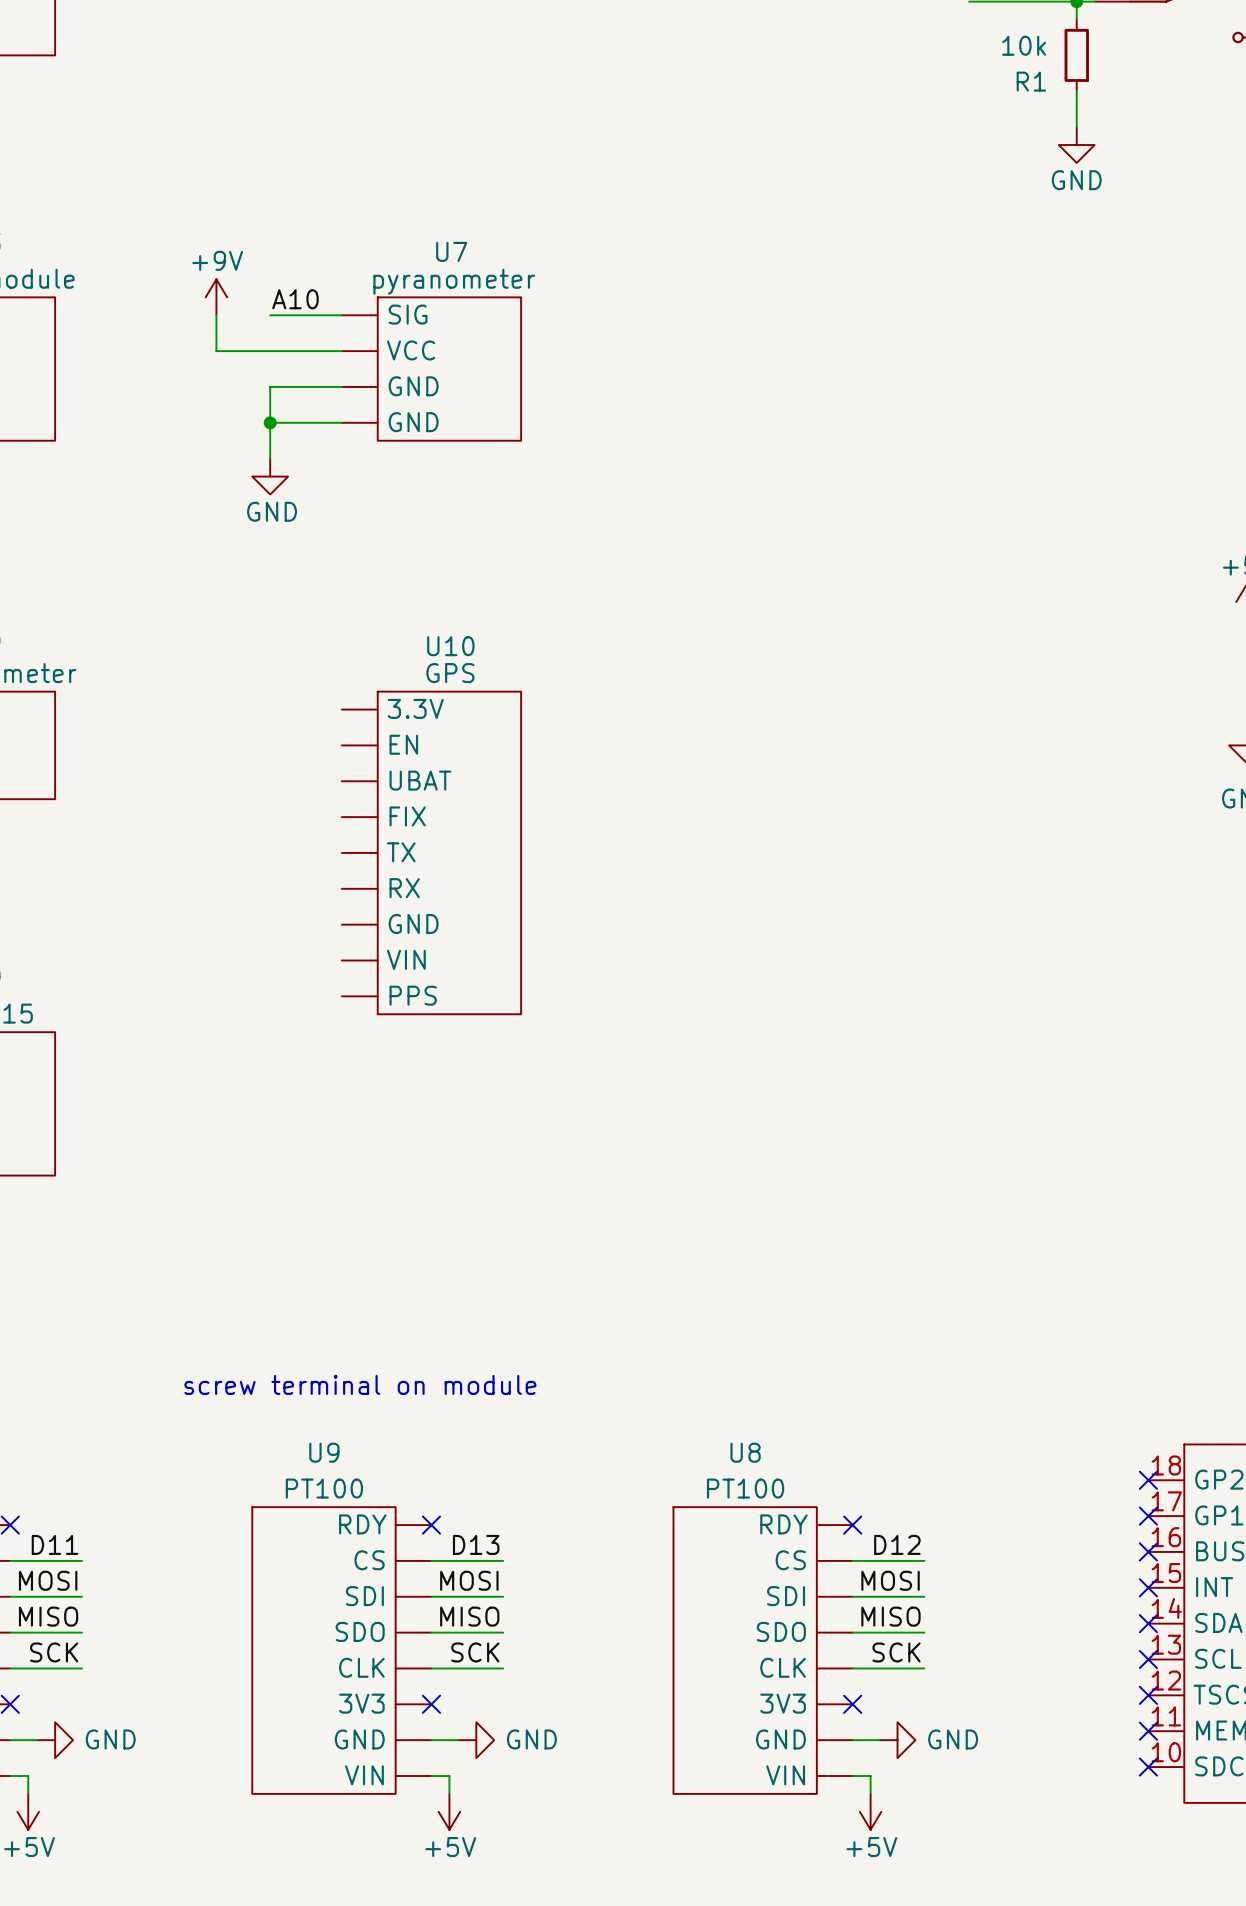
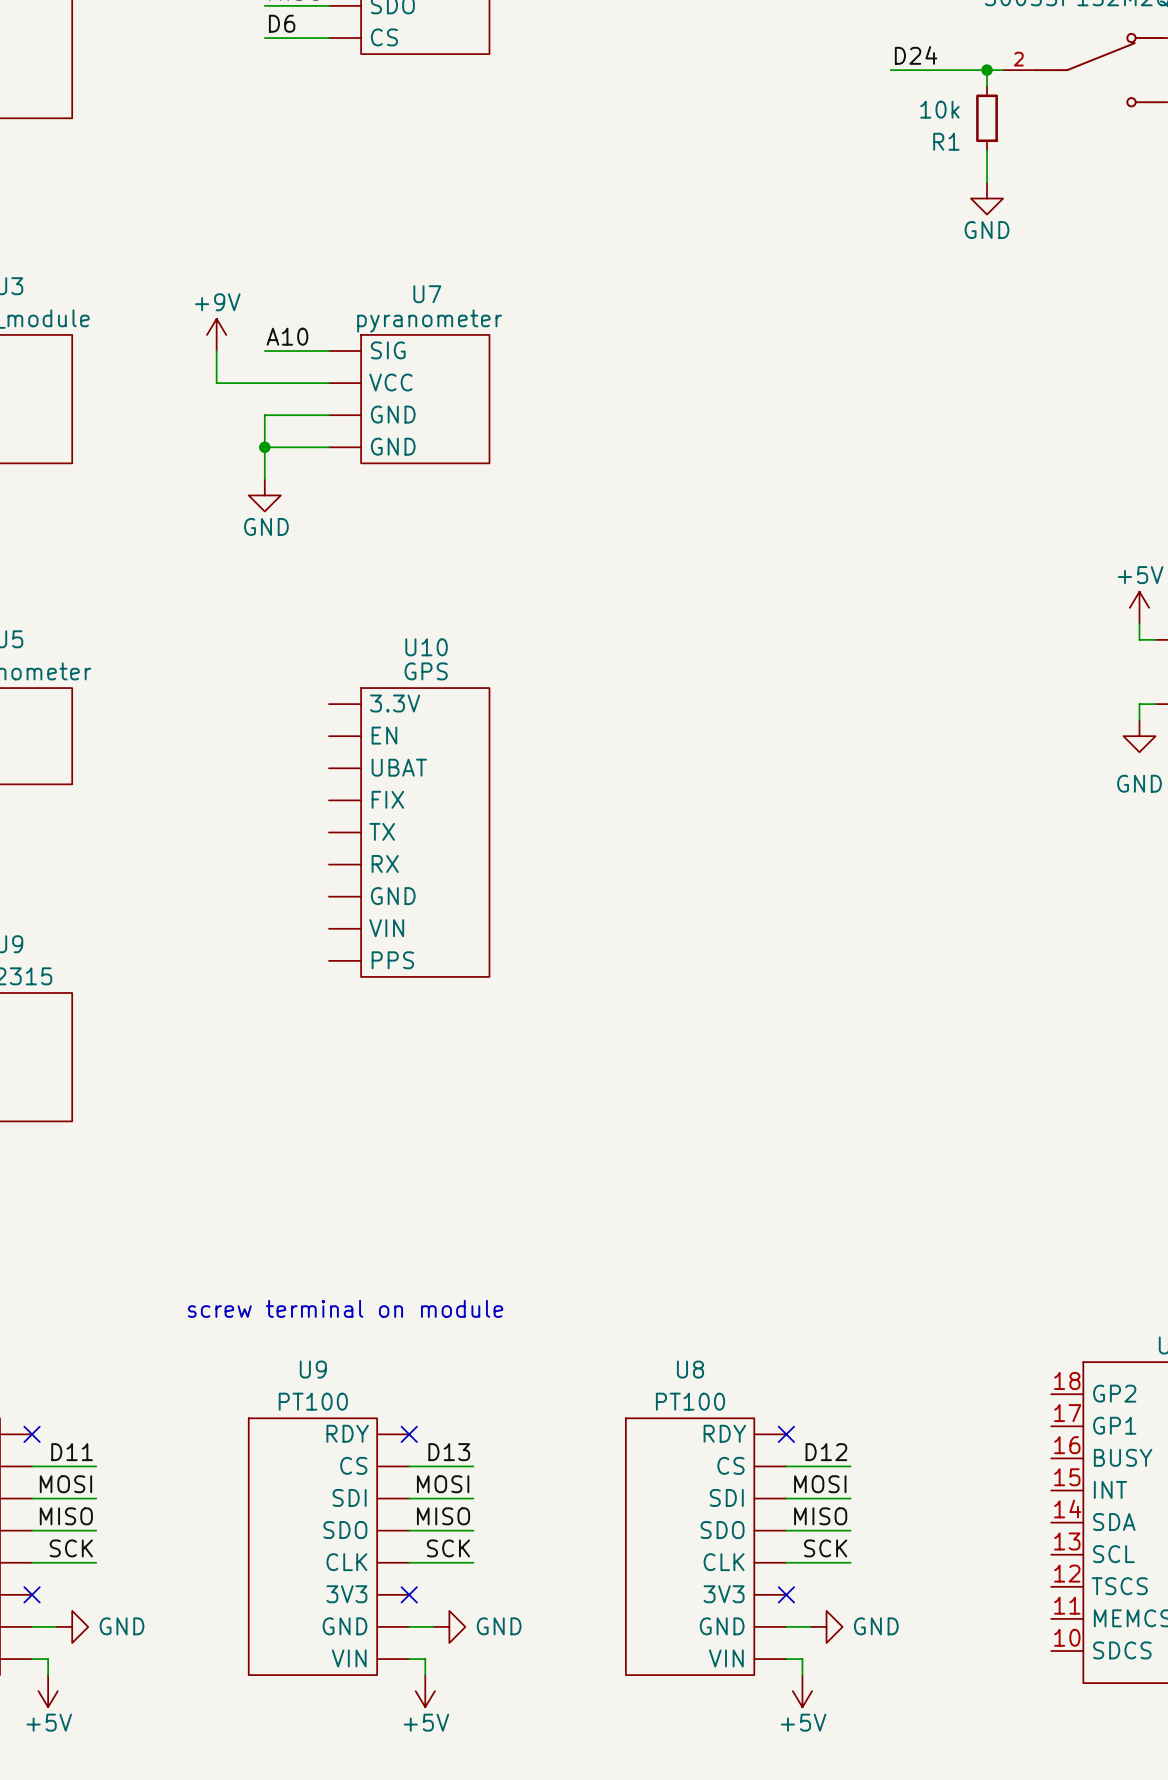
no-connect mark: (1148, 1480) -> none
no-connect mark: (1148, 1516) -> none
no-connect mark: (1148, 1551) -> none
no-connect mark: (1148, 1587) -> none
no-connect mark: (1148, 1623) -> none
no-connect mark: (1148, 1659) -> none
no-connect mark: (1148, 1695) -> none
no-connect mark: (1148, 1731) -> none
no-connect mark: (1148, 1767) -> none

